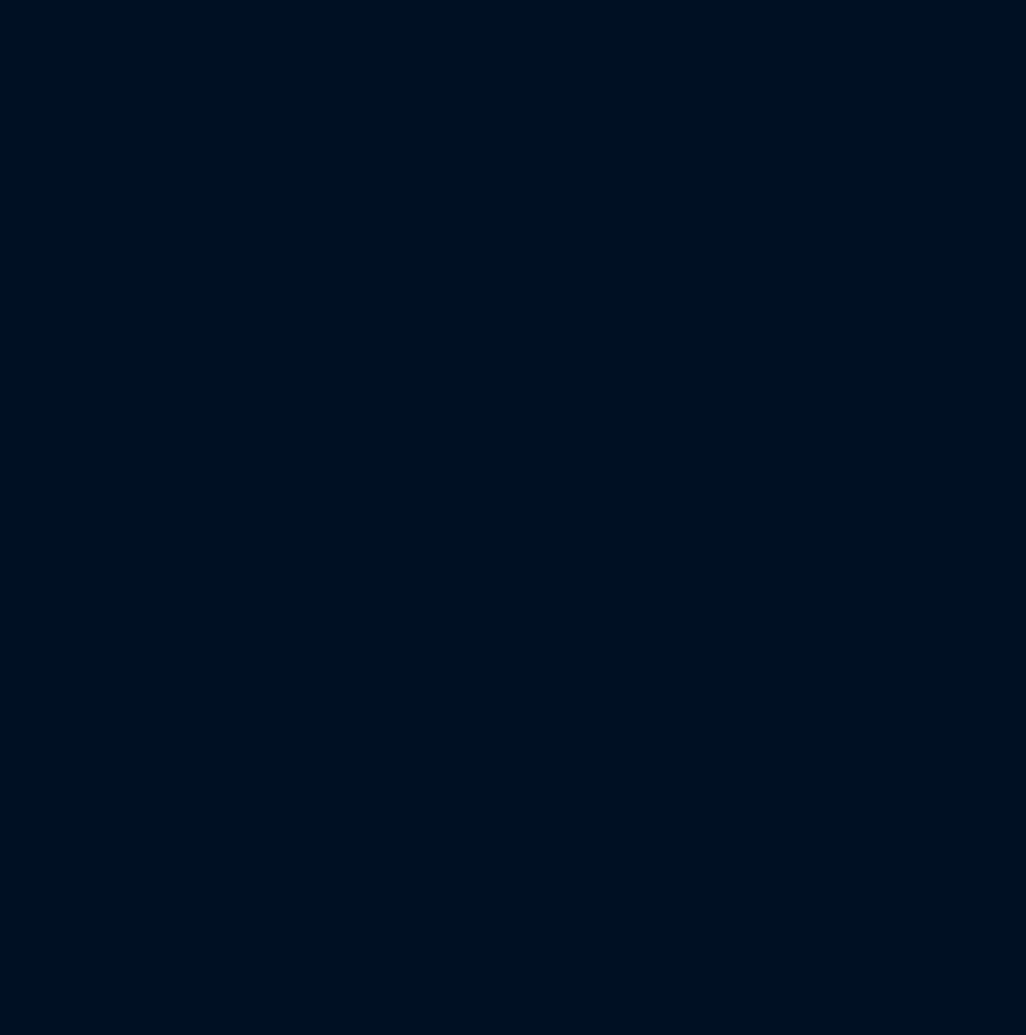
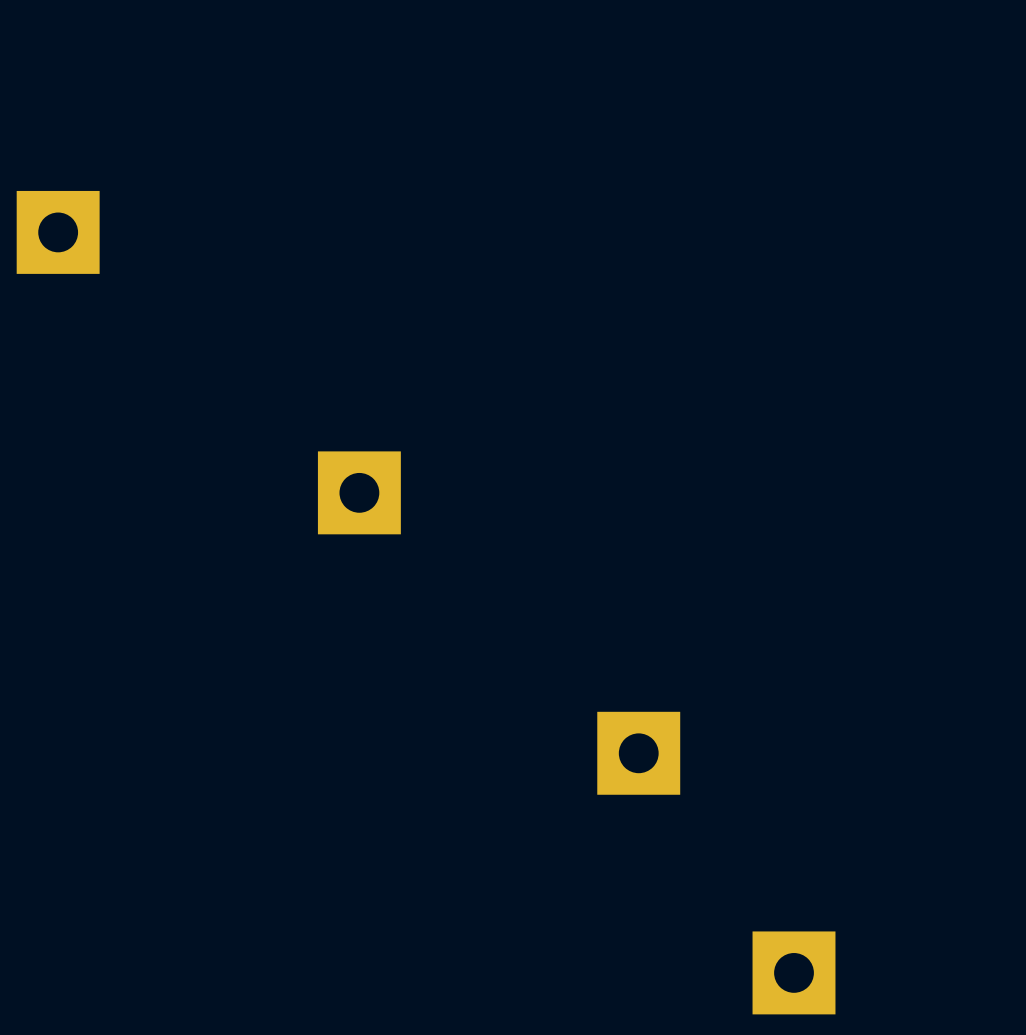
part: none -> (58, 232)
part: none -> (359, 492)
part: none -> (638, 753)
part: none -> (794, 972)

